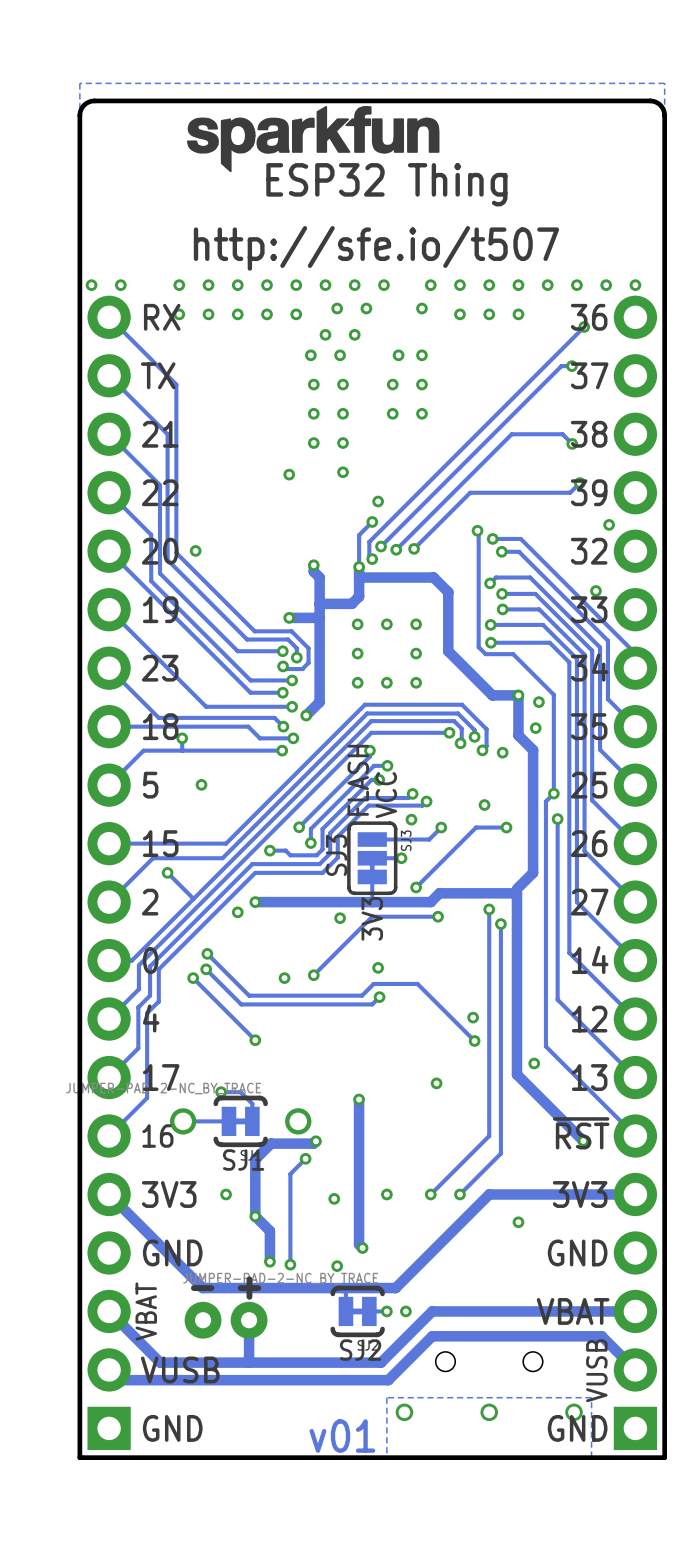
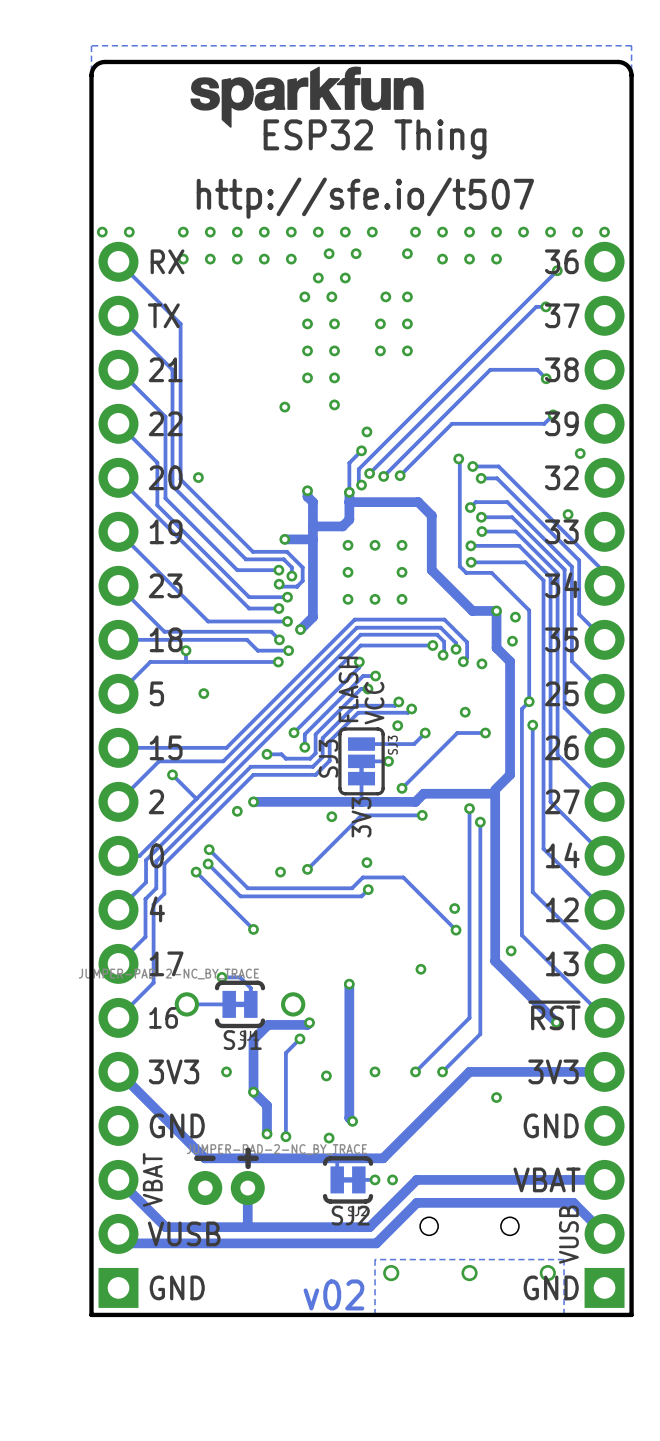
text: v01 (342, 1436) -> v02 (333, 1294)

